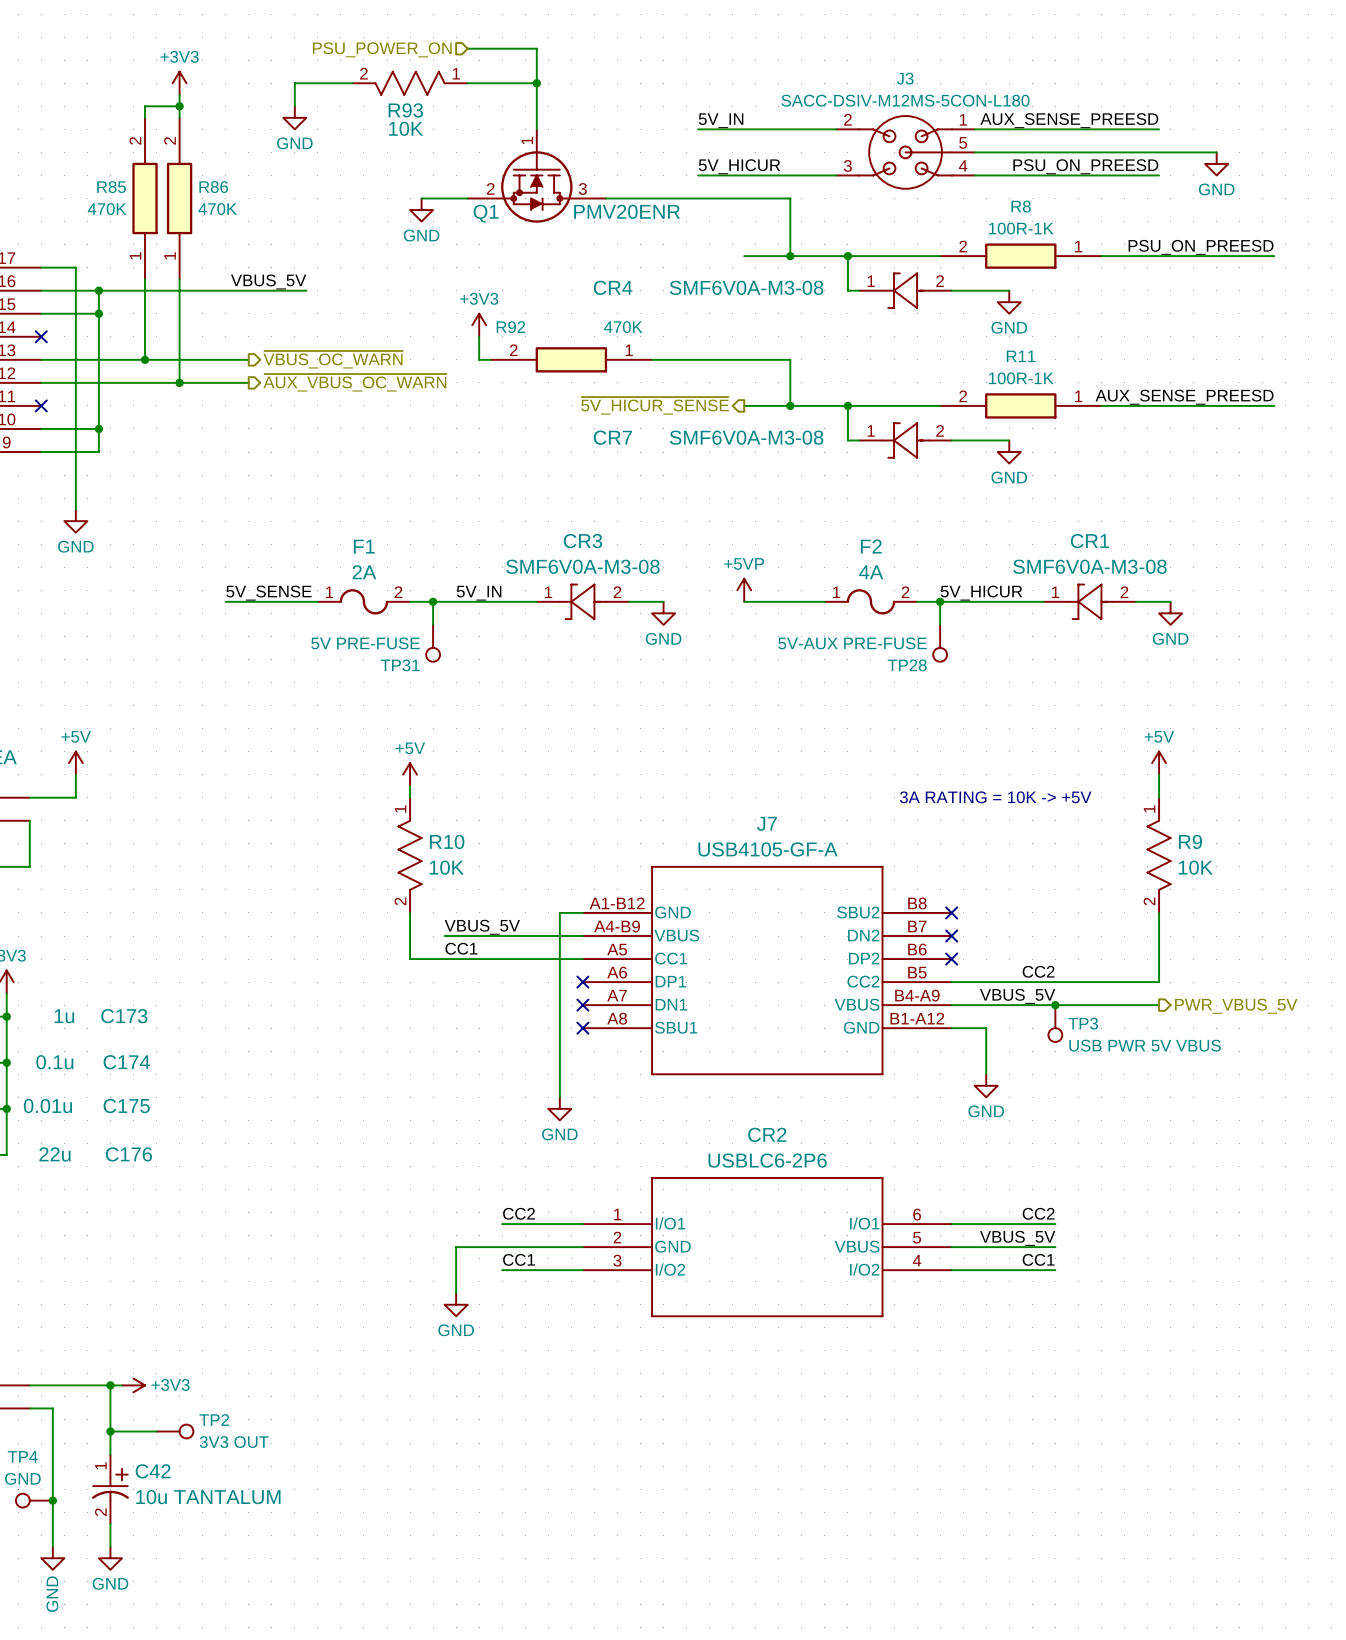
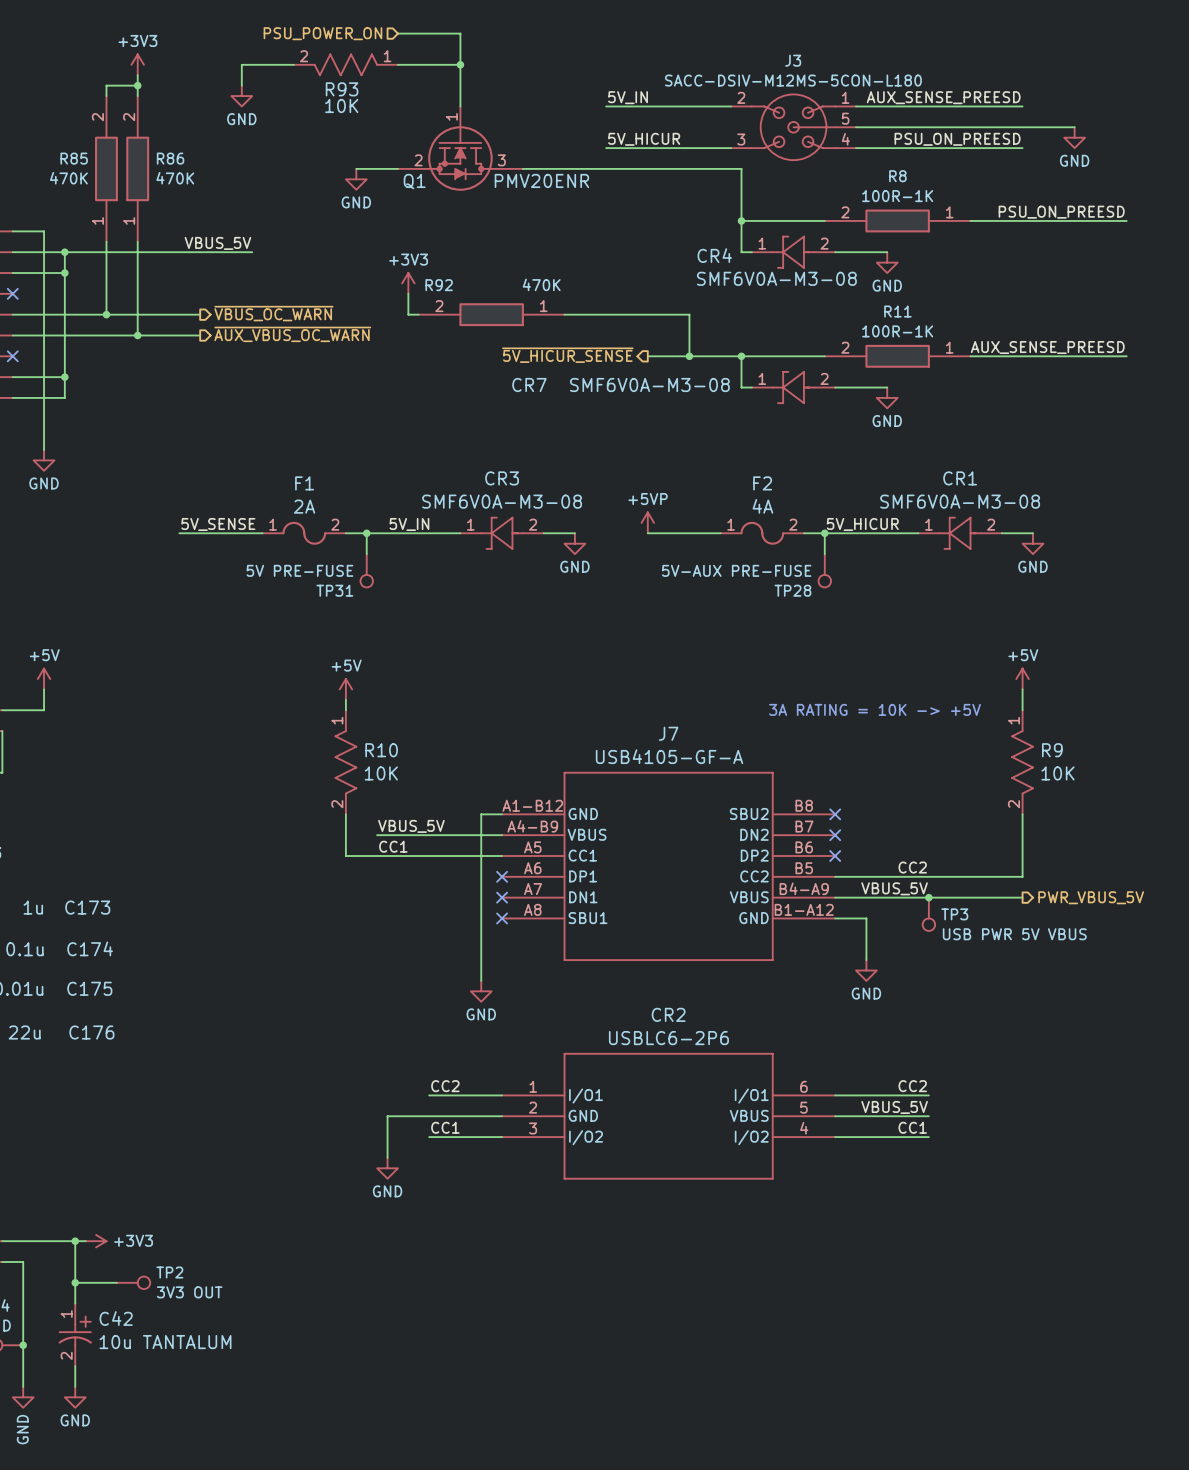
wire: (790, 198) (790, 256) -> (689, 168) (741, 168) (741, 220)
wire: (744, 256) (847, 256) -> none
junction: (790, 256) -> none
CR4 name position: CR4 (613, 287) -> CR4 (714, 255)
CR4 value position: SMF6V0A-M3-08 (746, 287) -> SMF6V0A-M3-08 (776, 278)

